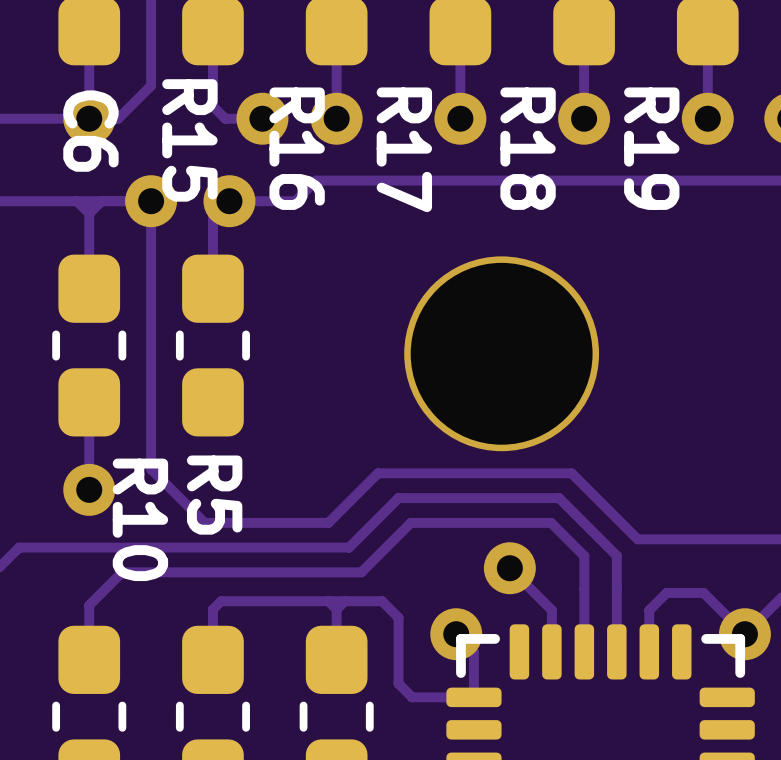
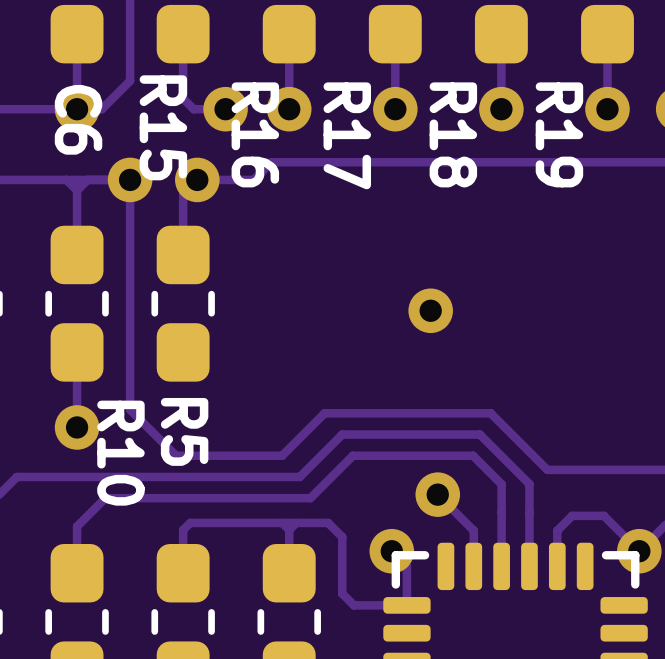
via size: [404, 256, 600, 452] -> [408, 288, 453, 334]

